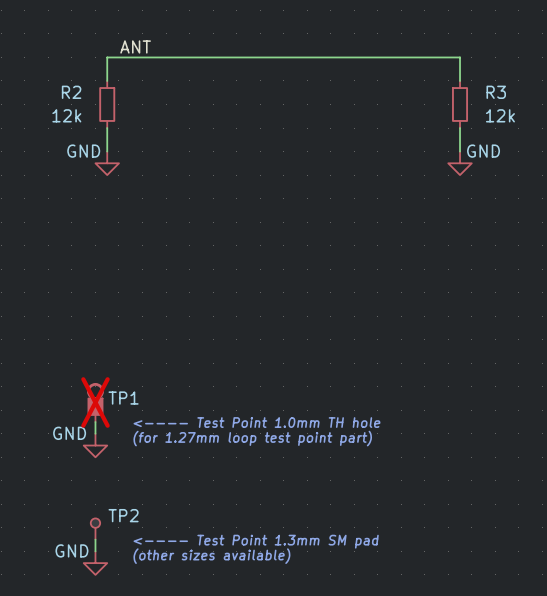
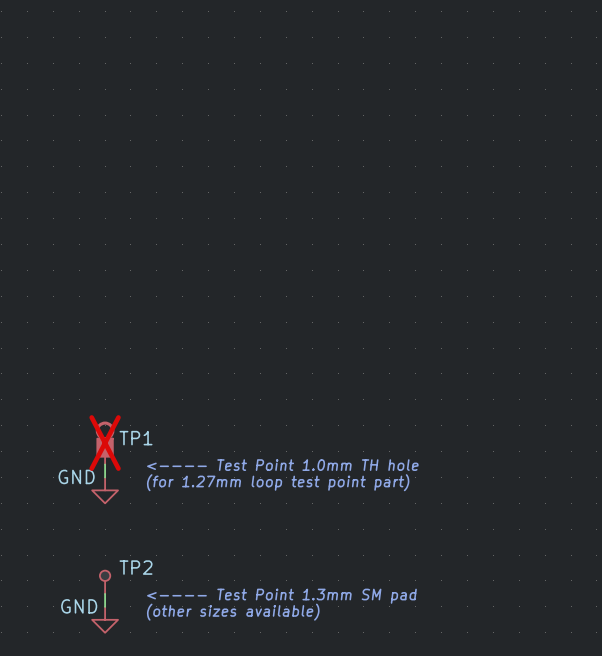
label: ANT (135, 46) -> none
wire: (107, 80) (107, 57) (460, 57) (460, 80) -> none
R2: 12k (107, 104) -> none
R3: 12k (460, 104) -> none
wire: (107, 128) (107, 151) -> none
wire: (460, 128) (460, 151) -> none
power symbol: GND (107, 163) -> none
power symbol: GND (460, 163) -> none

